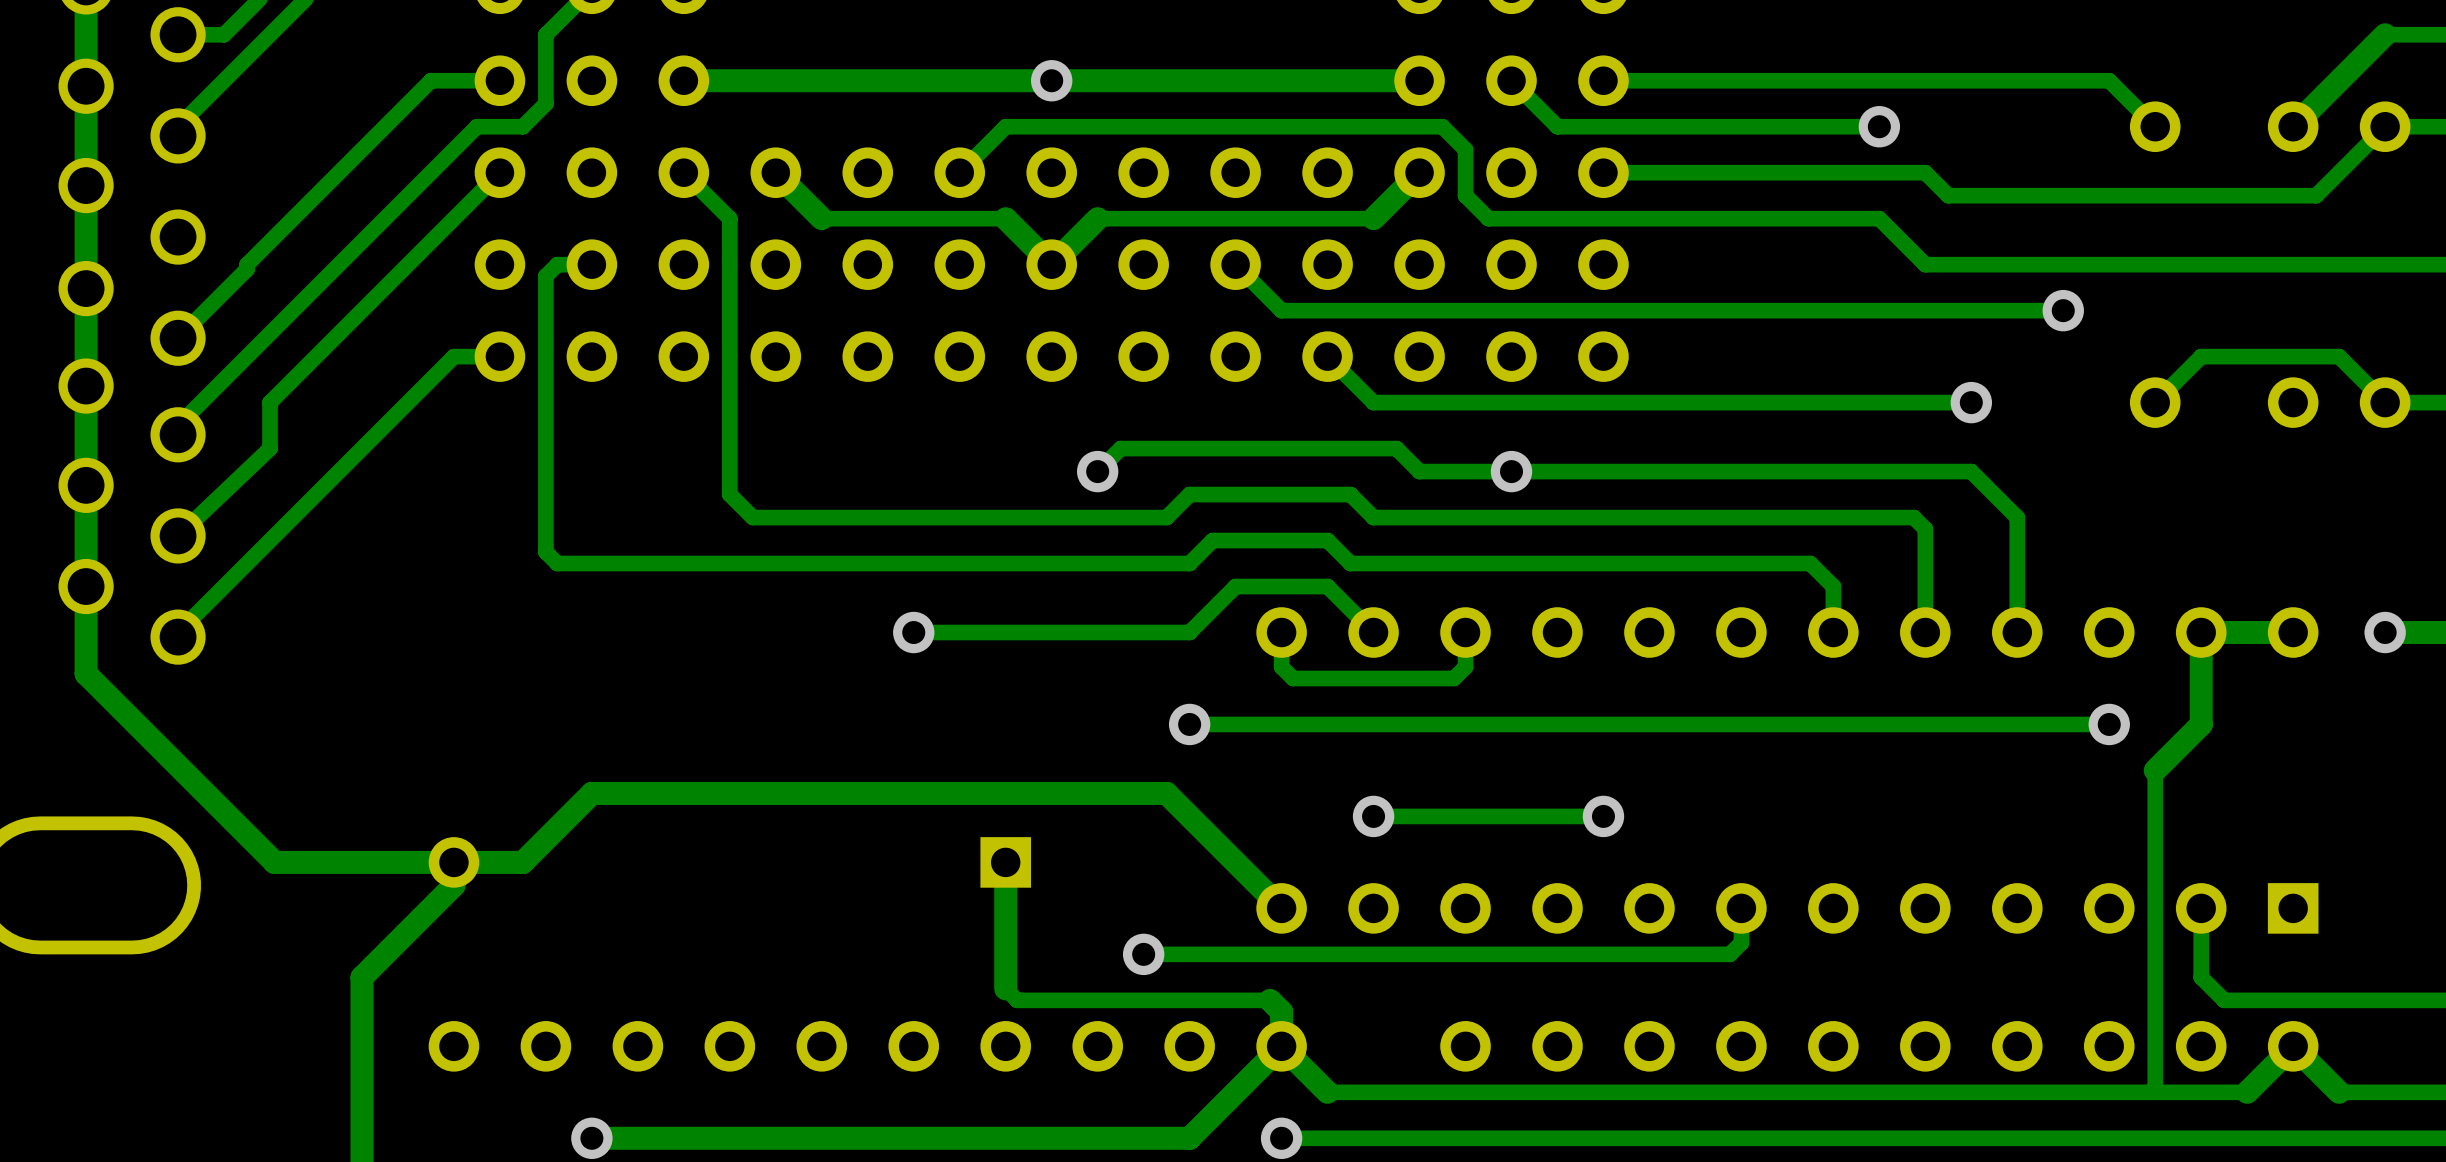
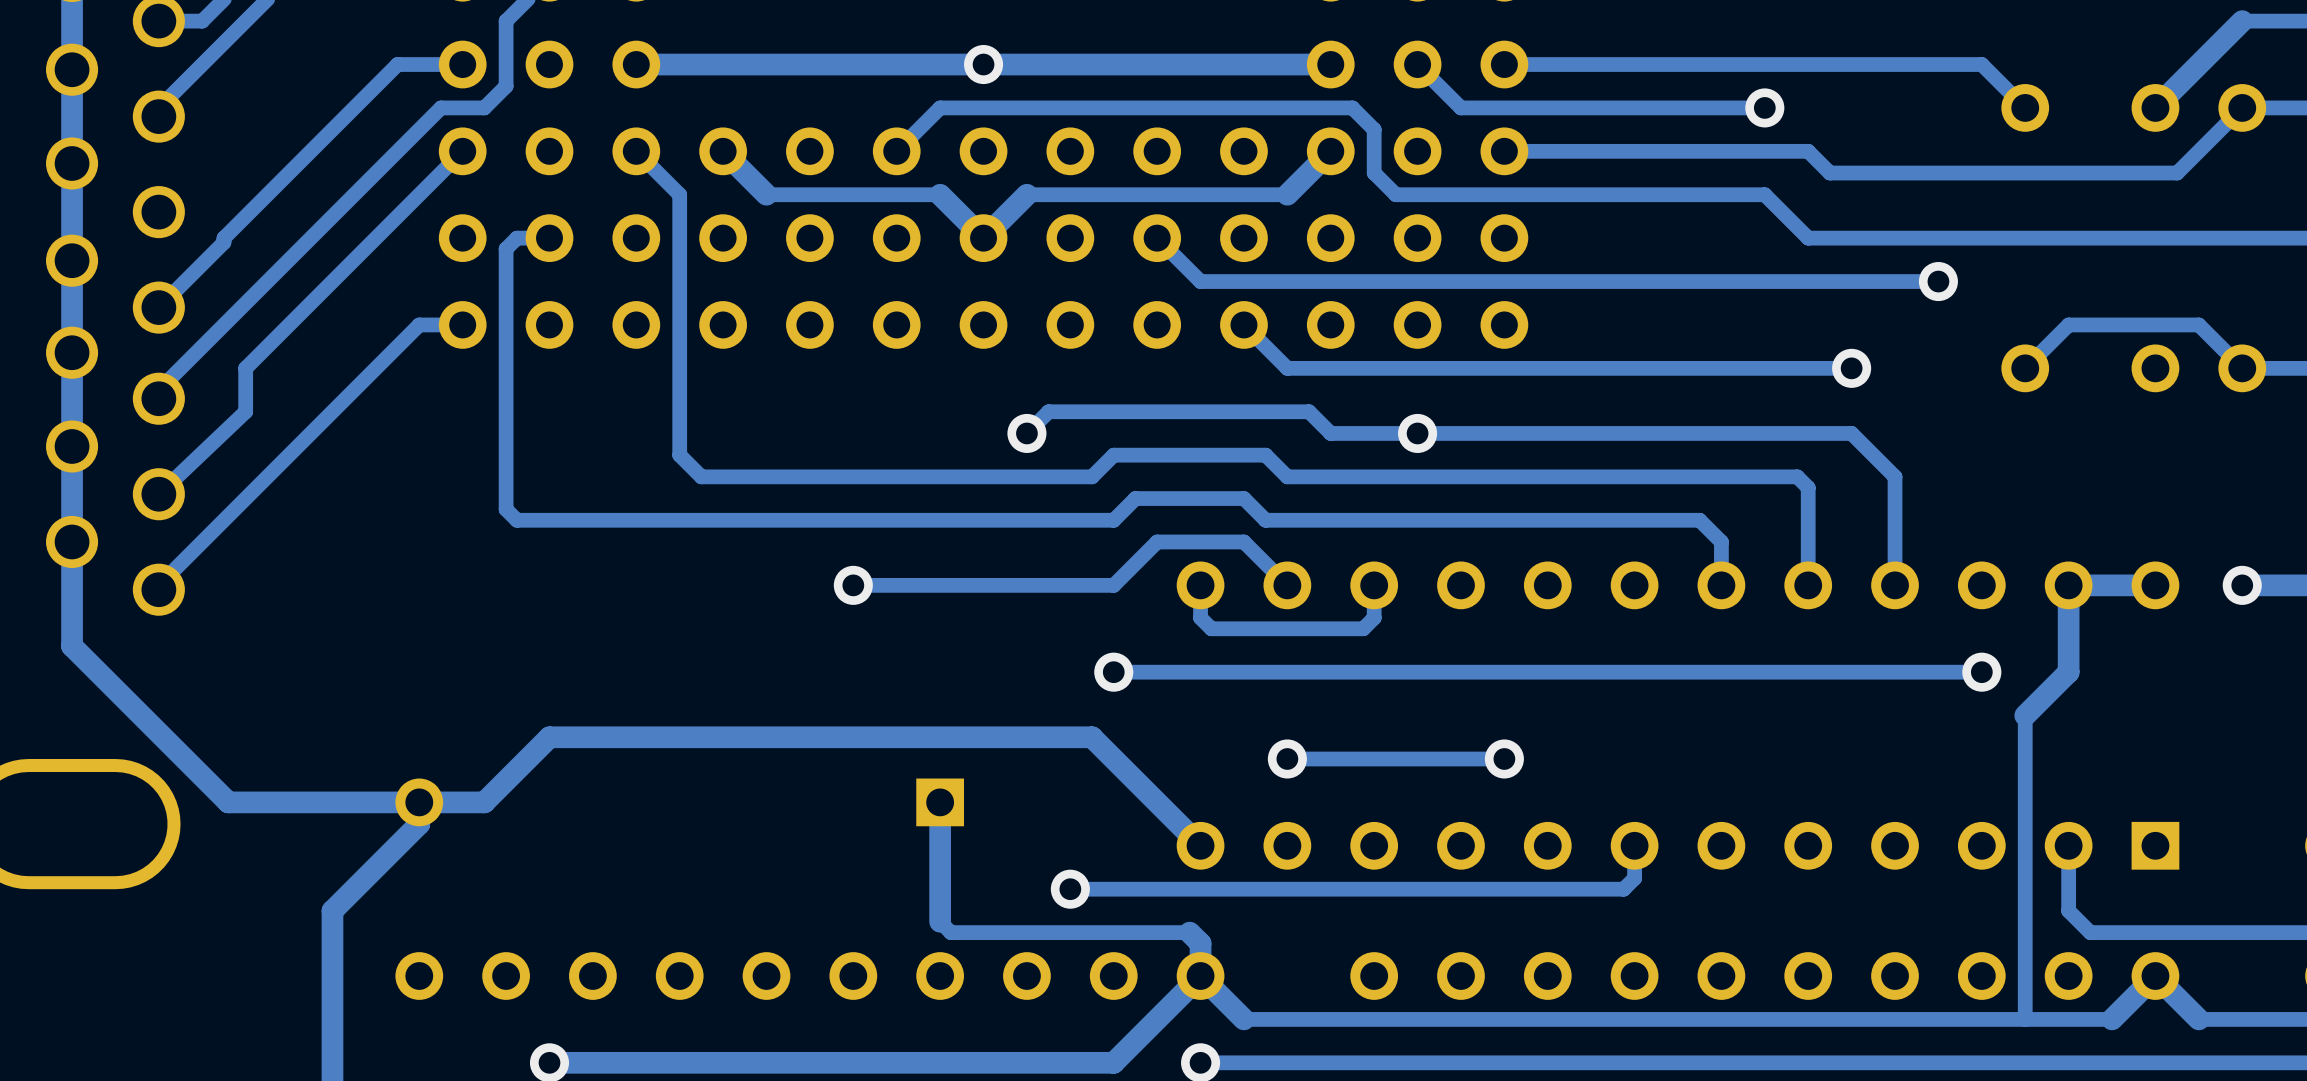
track: (86, 673) (274, 862) -> (72, 624) (72, 646) (228, 802) (250, 802)

